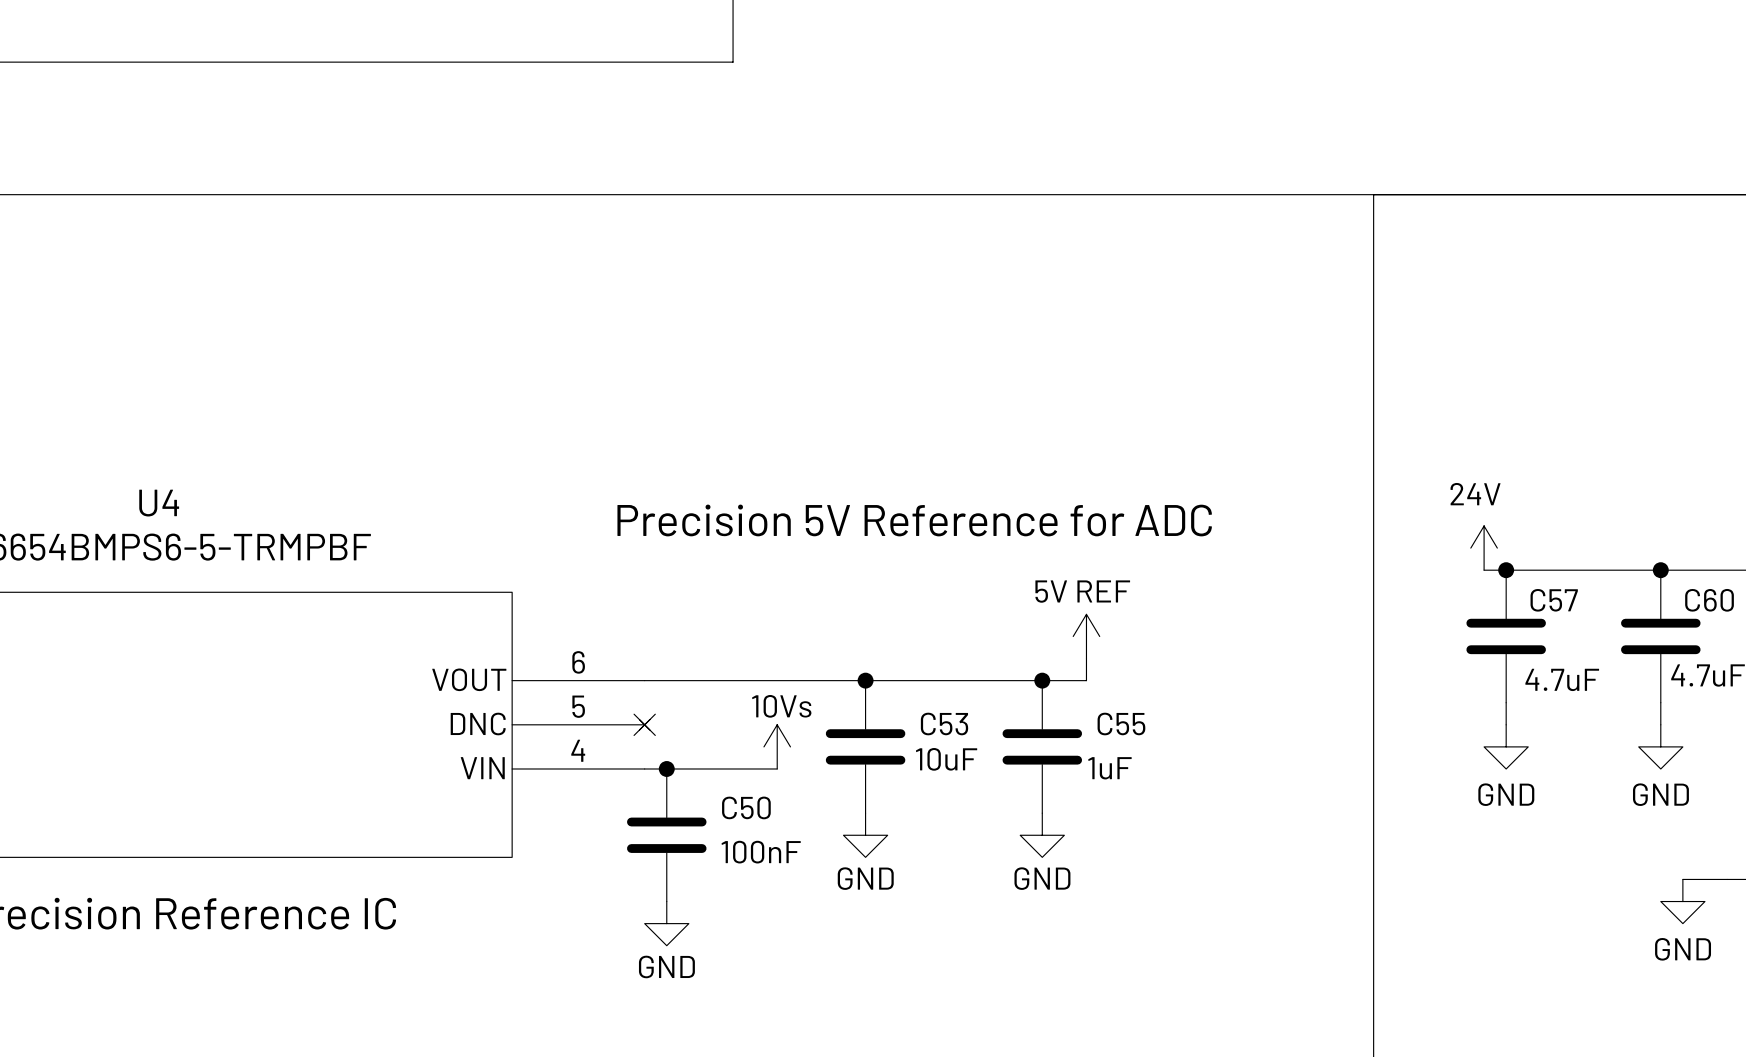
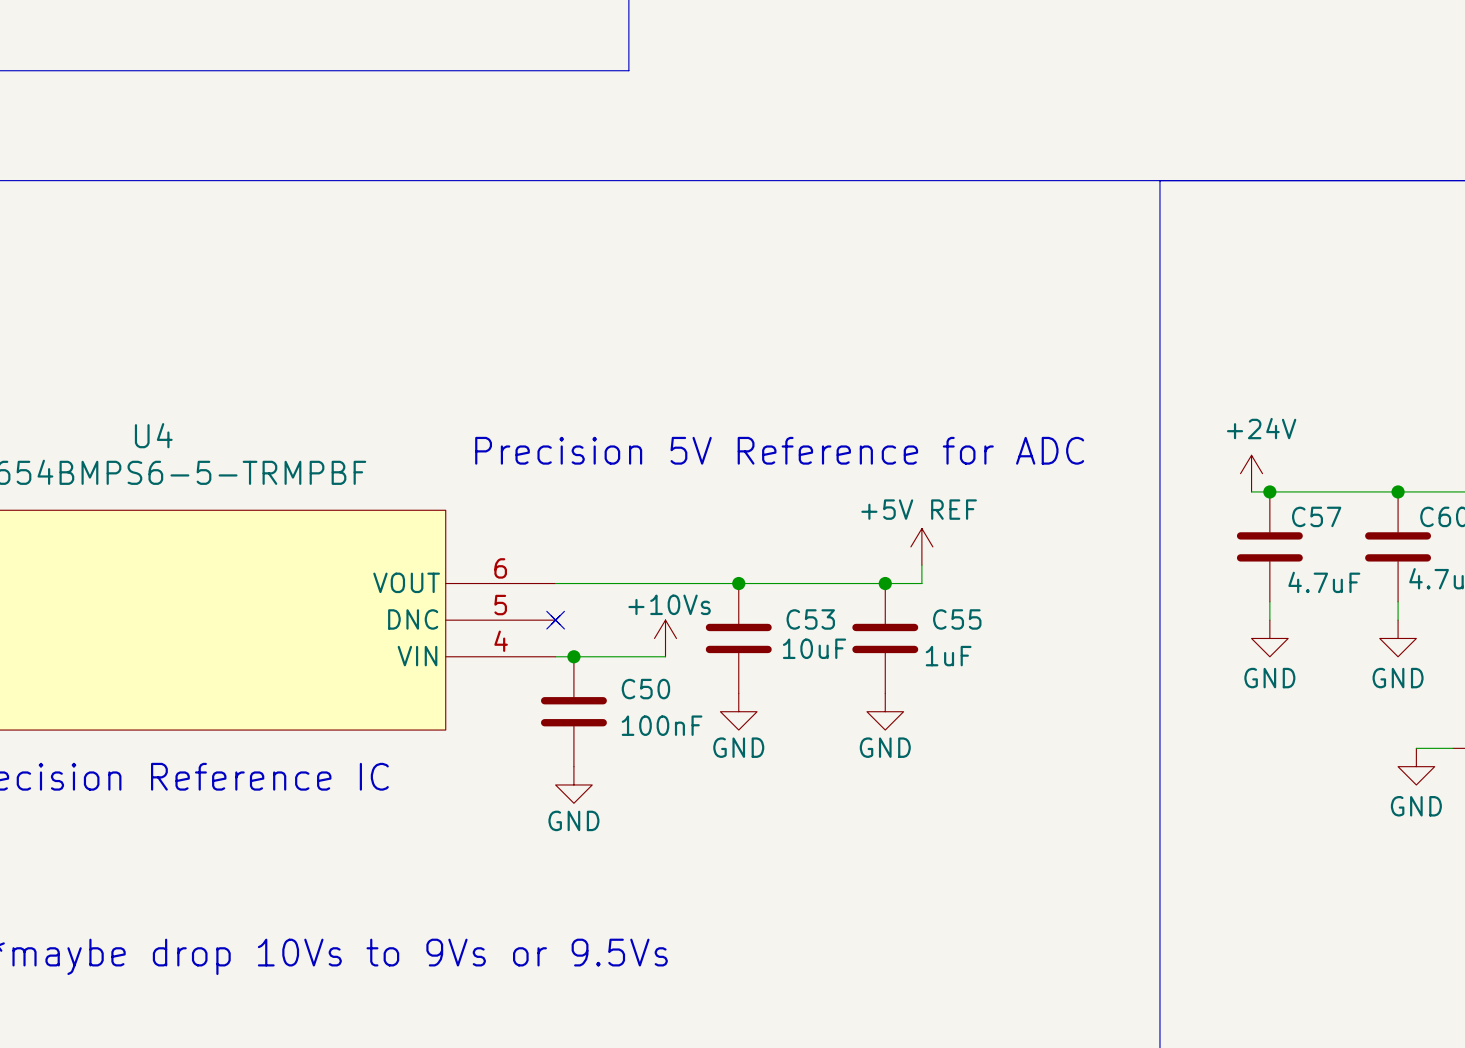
power symbol: 24V (1484, 548) -> +24V (1251, 473)
power symbol: 5V REF (1086, 636) -> +5V REF (921, 546)
power symbol: 10Vs (777, 746) -> +10Vs (665, 638)

